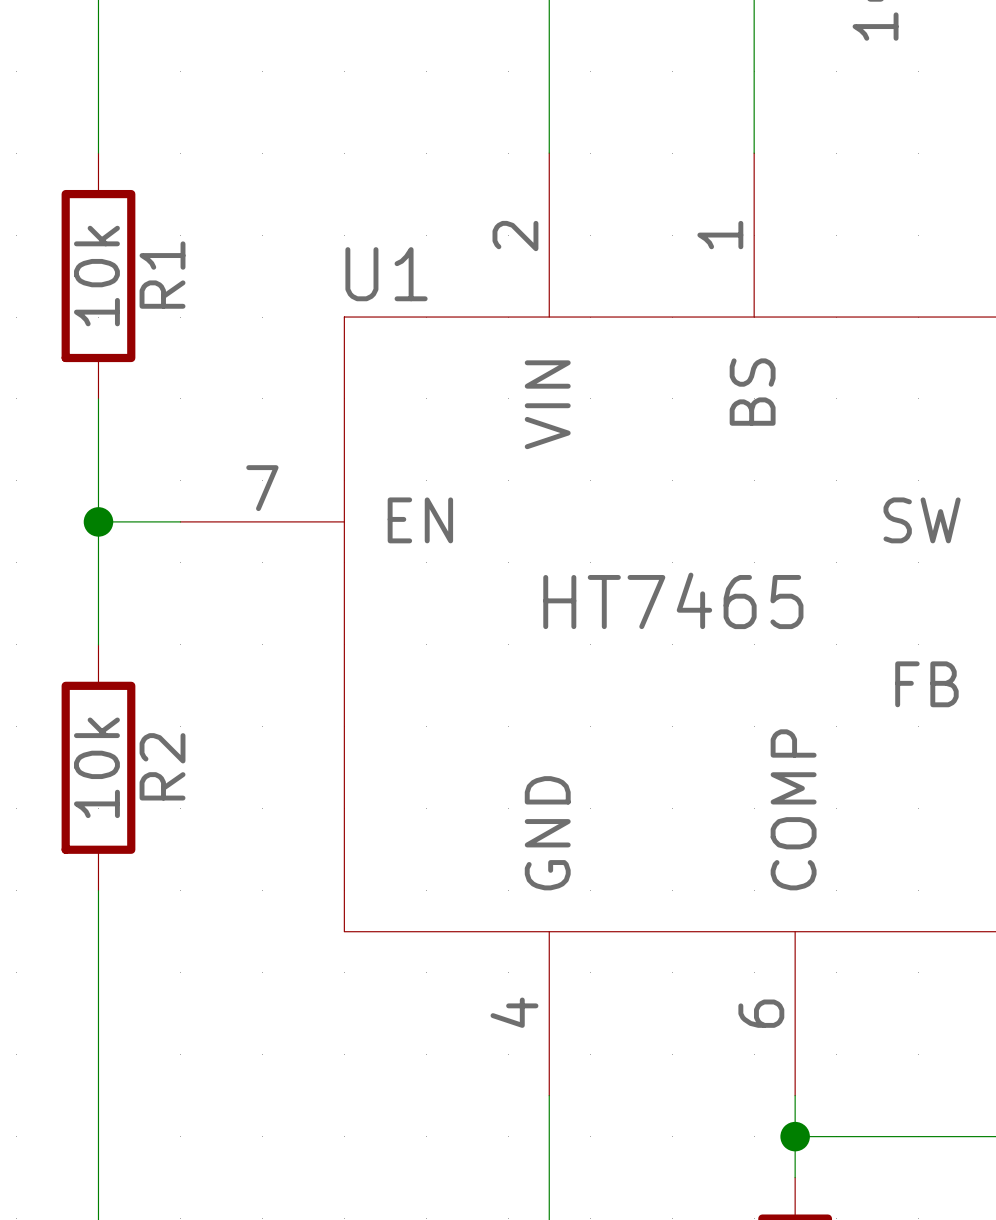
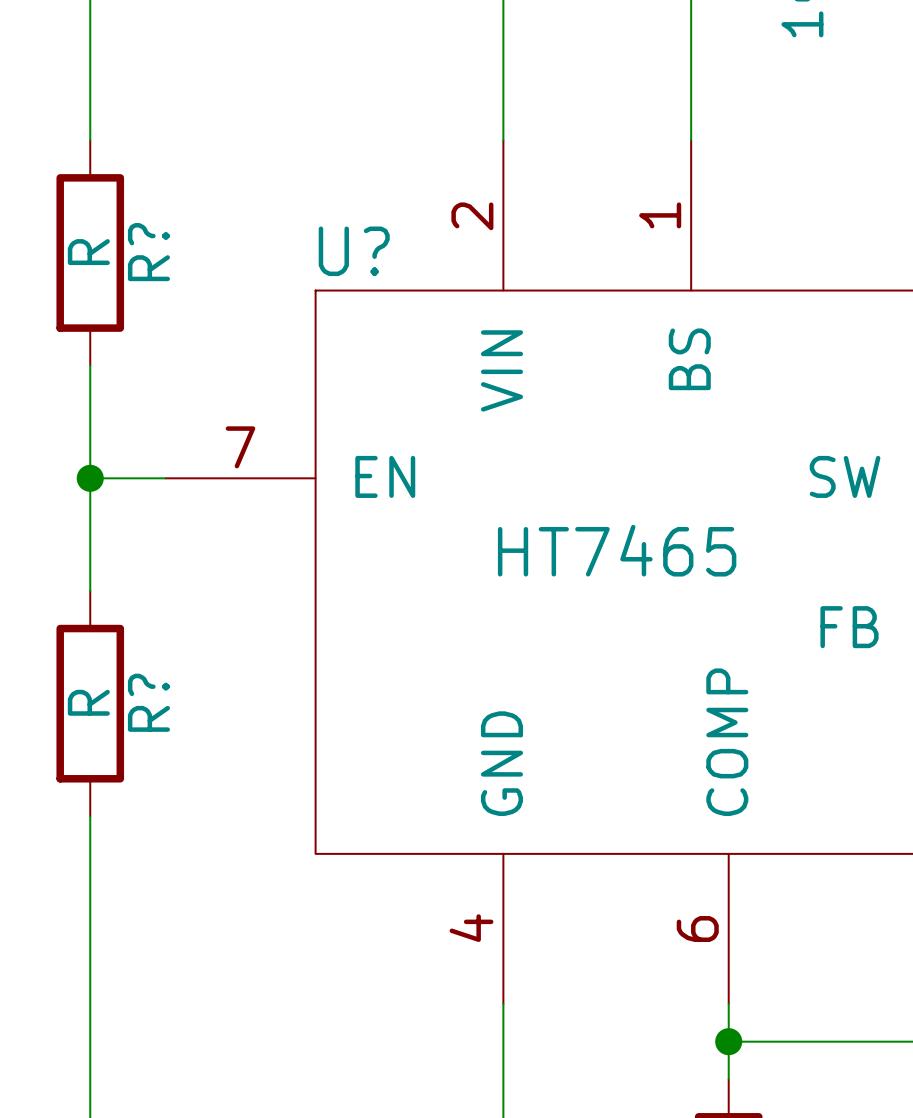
U1 name: U1 (386, 274) -> U? (354, 251)
R1 name: R1 (162, 275) -> R? (148, 252)
R1 value: 10k (96, 276) -> R (88, 252)
R2 name: R2 (162, 766) -> R? (148, 702)
R2 value: 10k (96, 767) -> R (88, 702)

